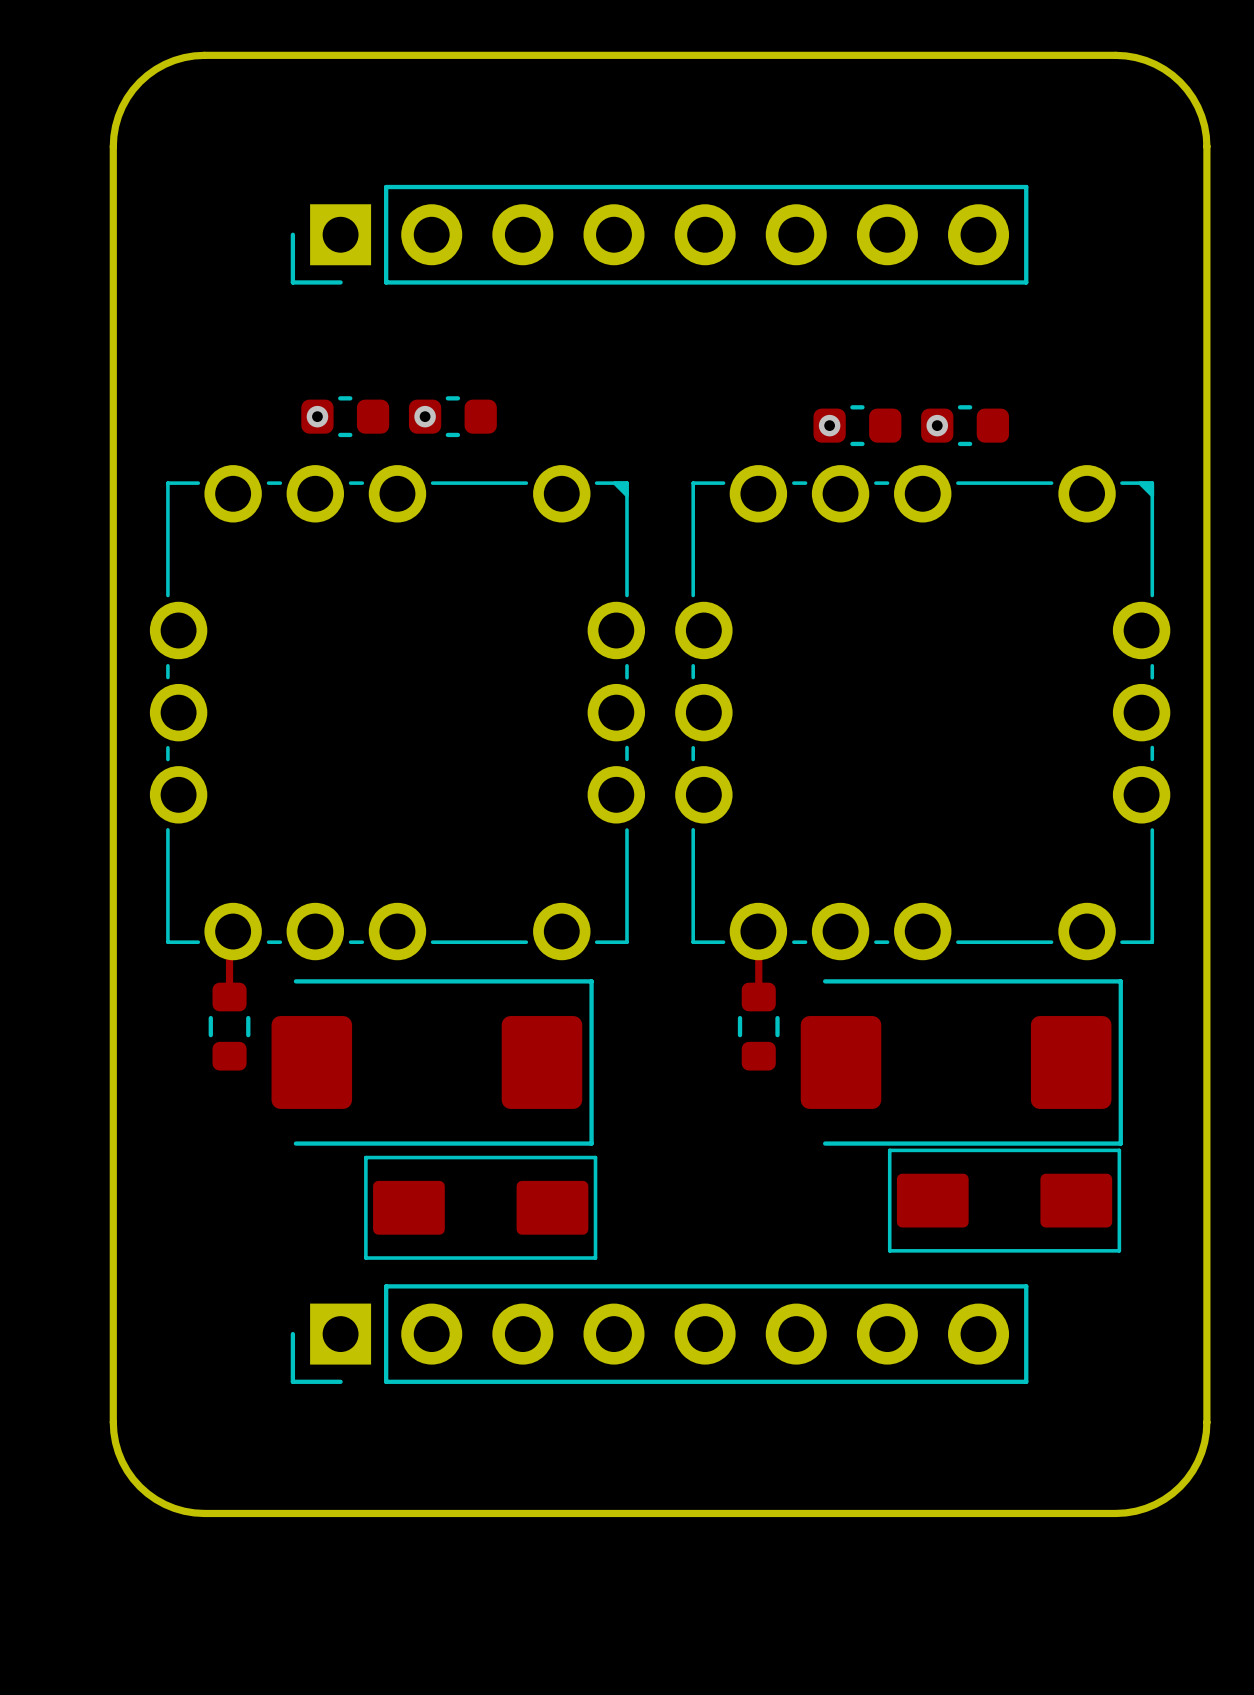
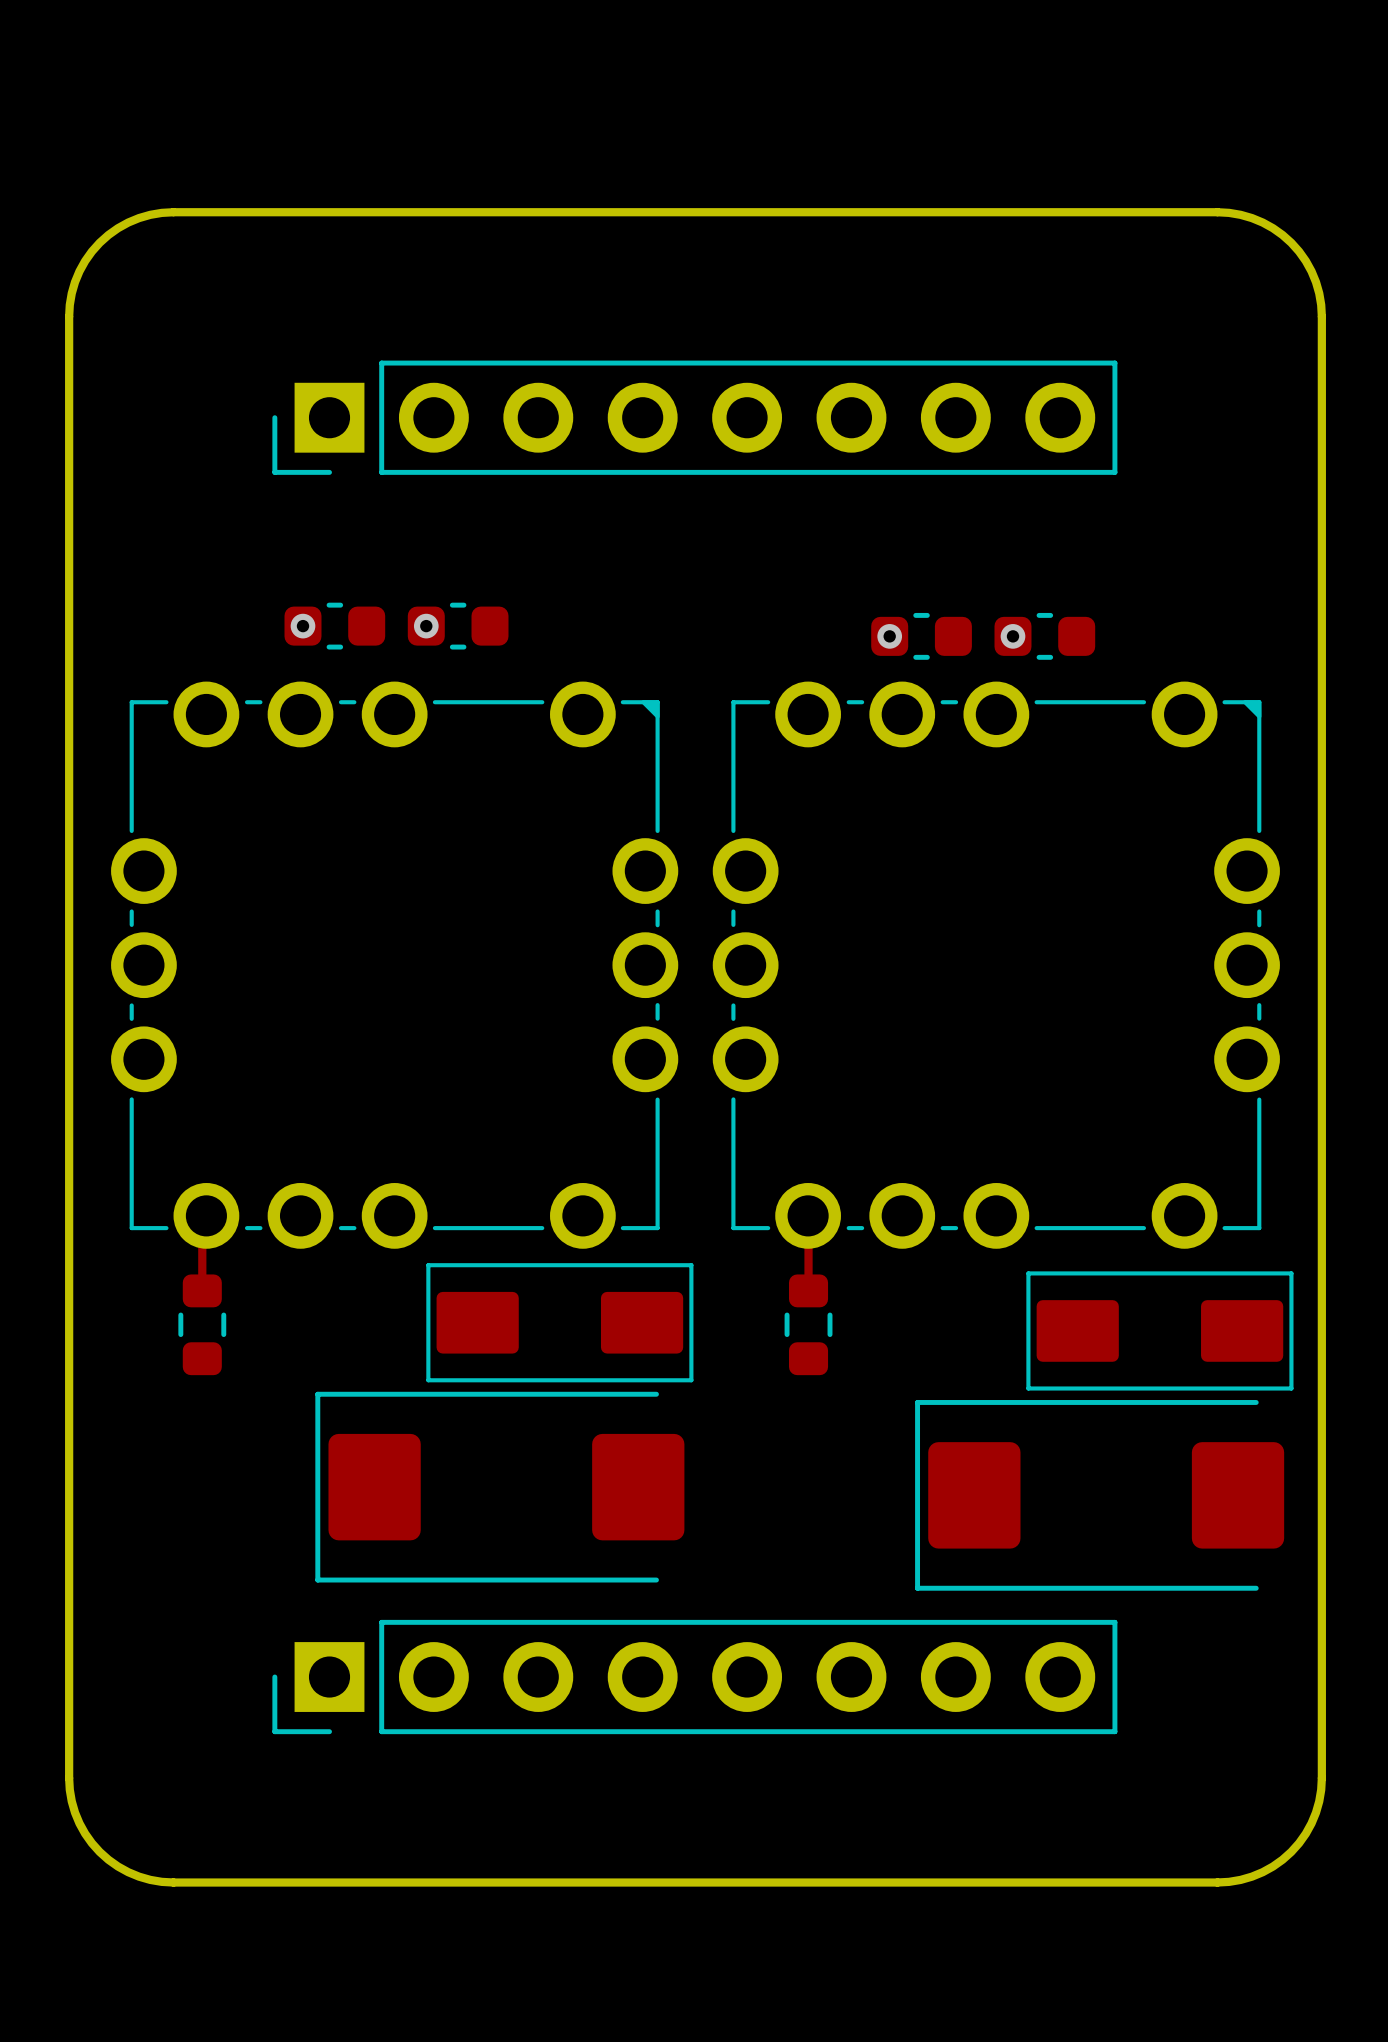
part: none -> (1159, 1330)
part rotation: 0° (432, 1062) -> 180° (499, 1487)
part: (961, 1062) -> none
part footprint: [887, 1148, 1122, 1253] -> [915, 1400, 1285, 1591]
part position: (480, 1207) -> (559, 1322)

